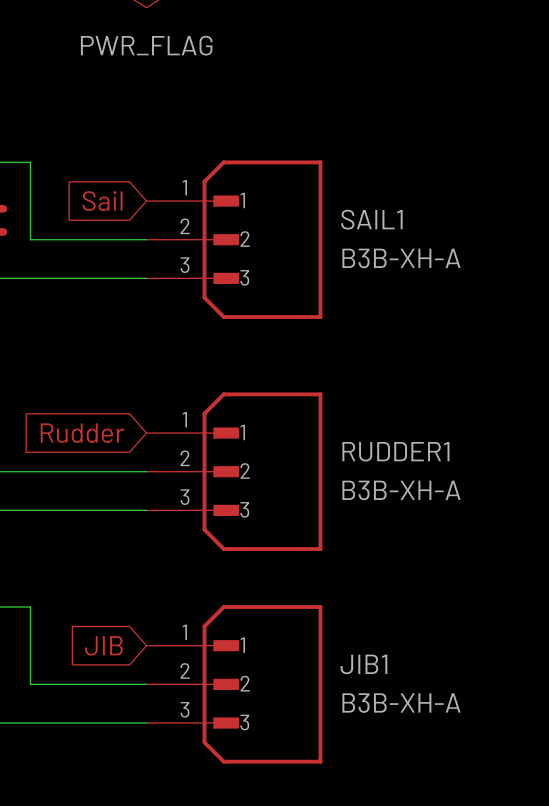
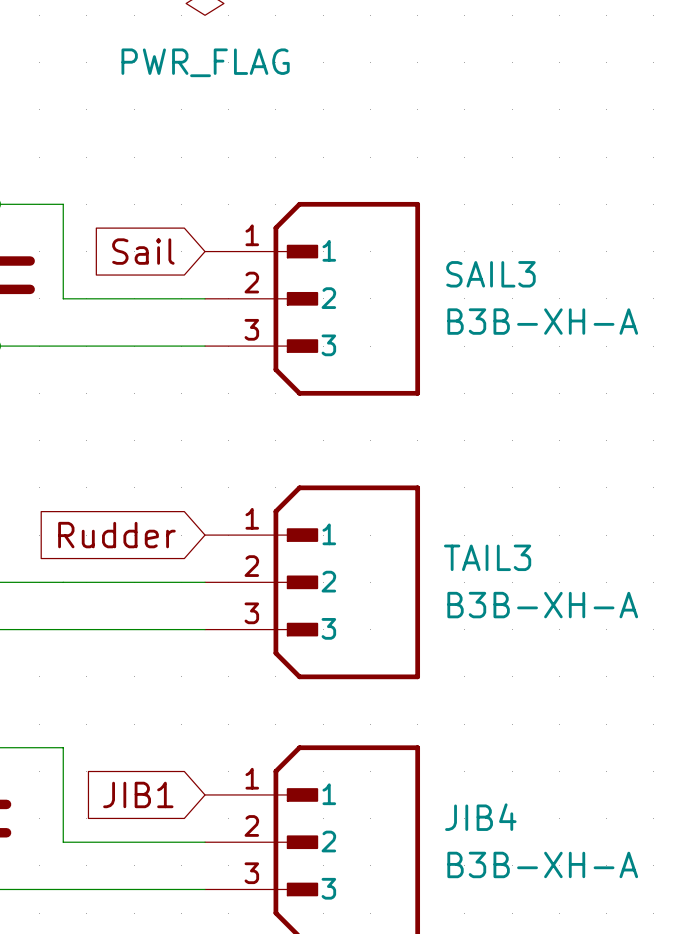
SAIL1 name: SAIL1 (371, 219) -> SAIL3 (490, 274)
RUDDER1 name: RUDDER1 (395, 451) -> TAIL3 (487, 557)
global label: JIB (103, 645) -> JIB1 (138, 794)
JIB1 name: JIB1 (363, 664) -> JIB4 (480, 817)

